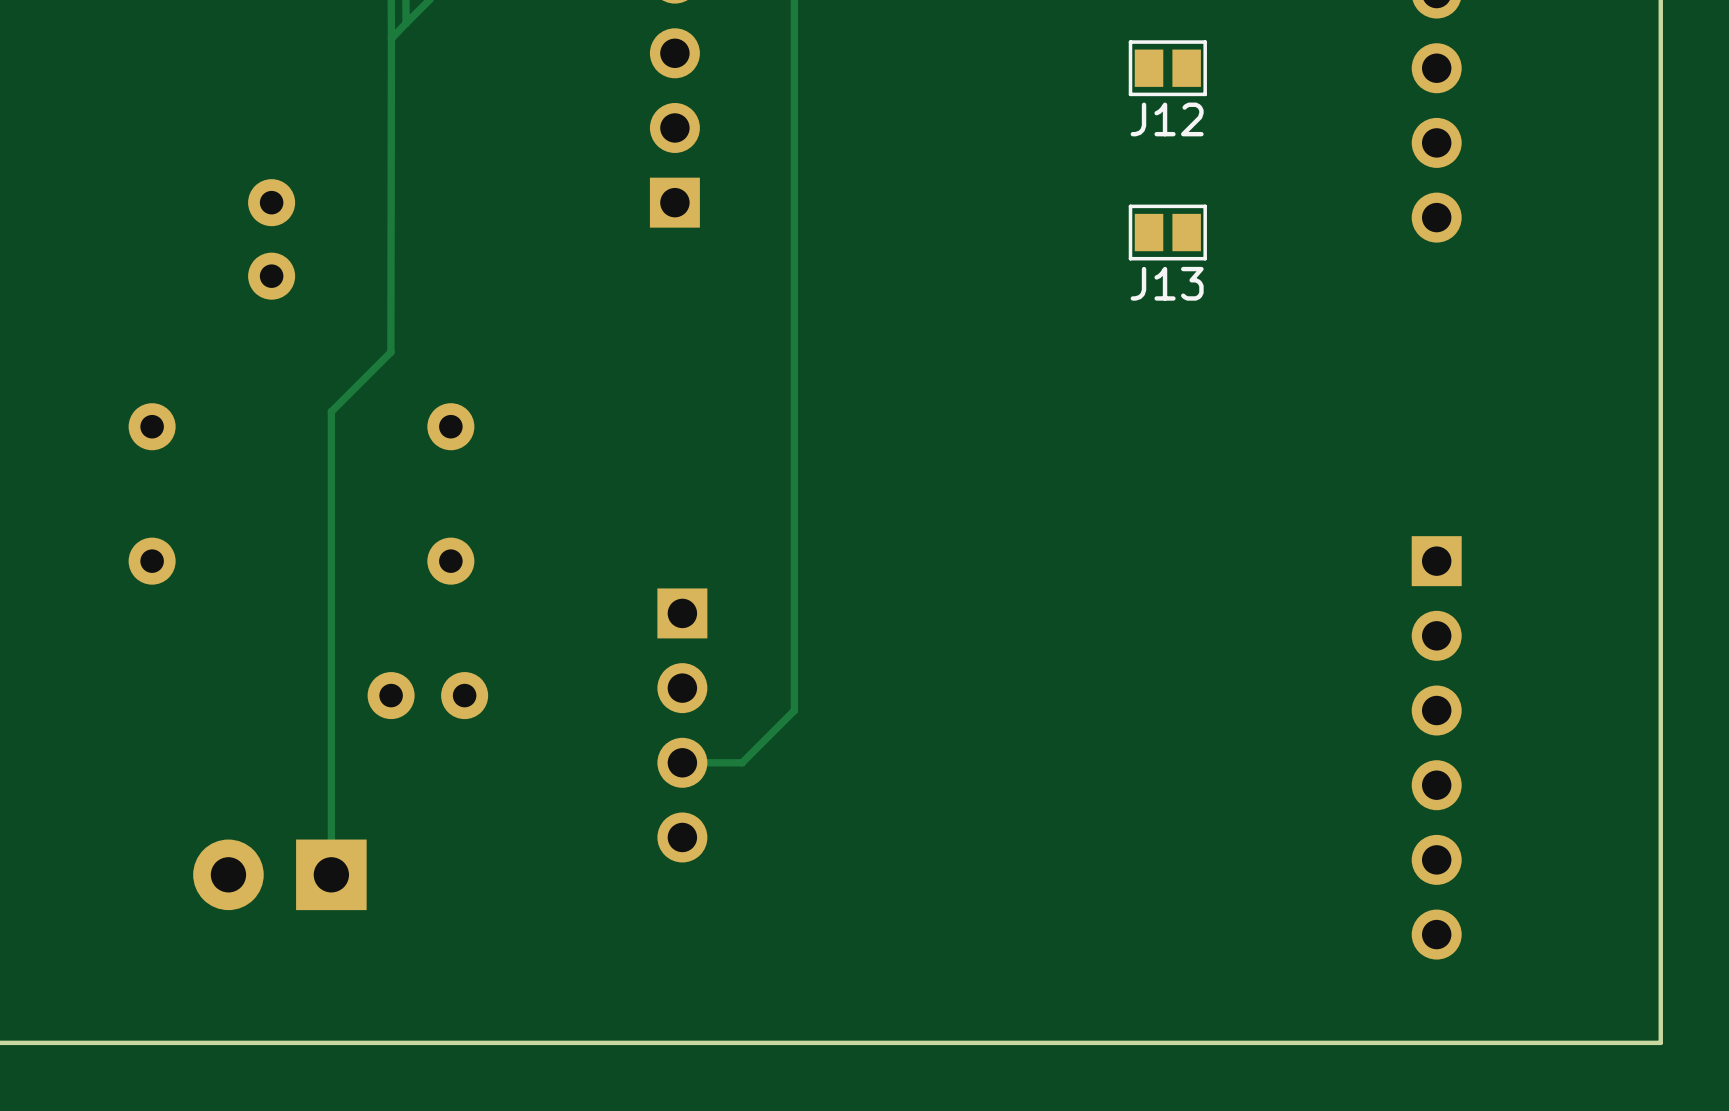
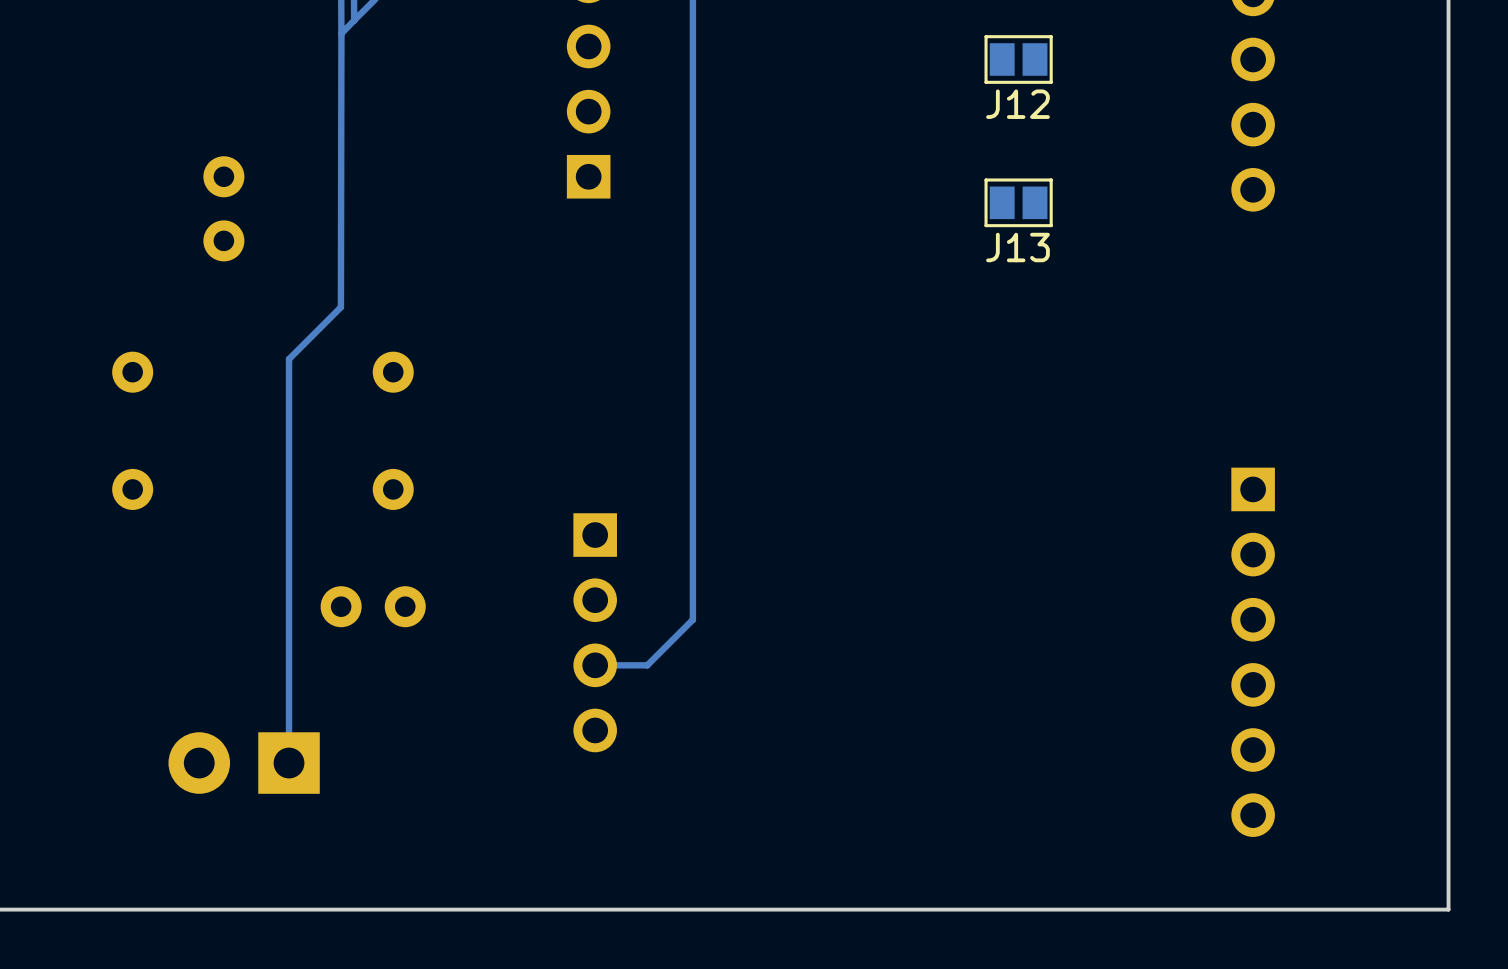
part position: (271, 239) -> (223, 208)

